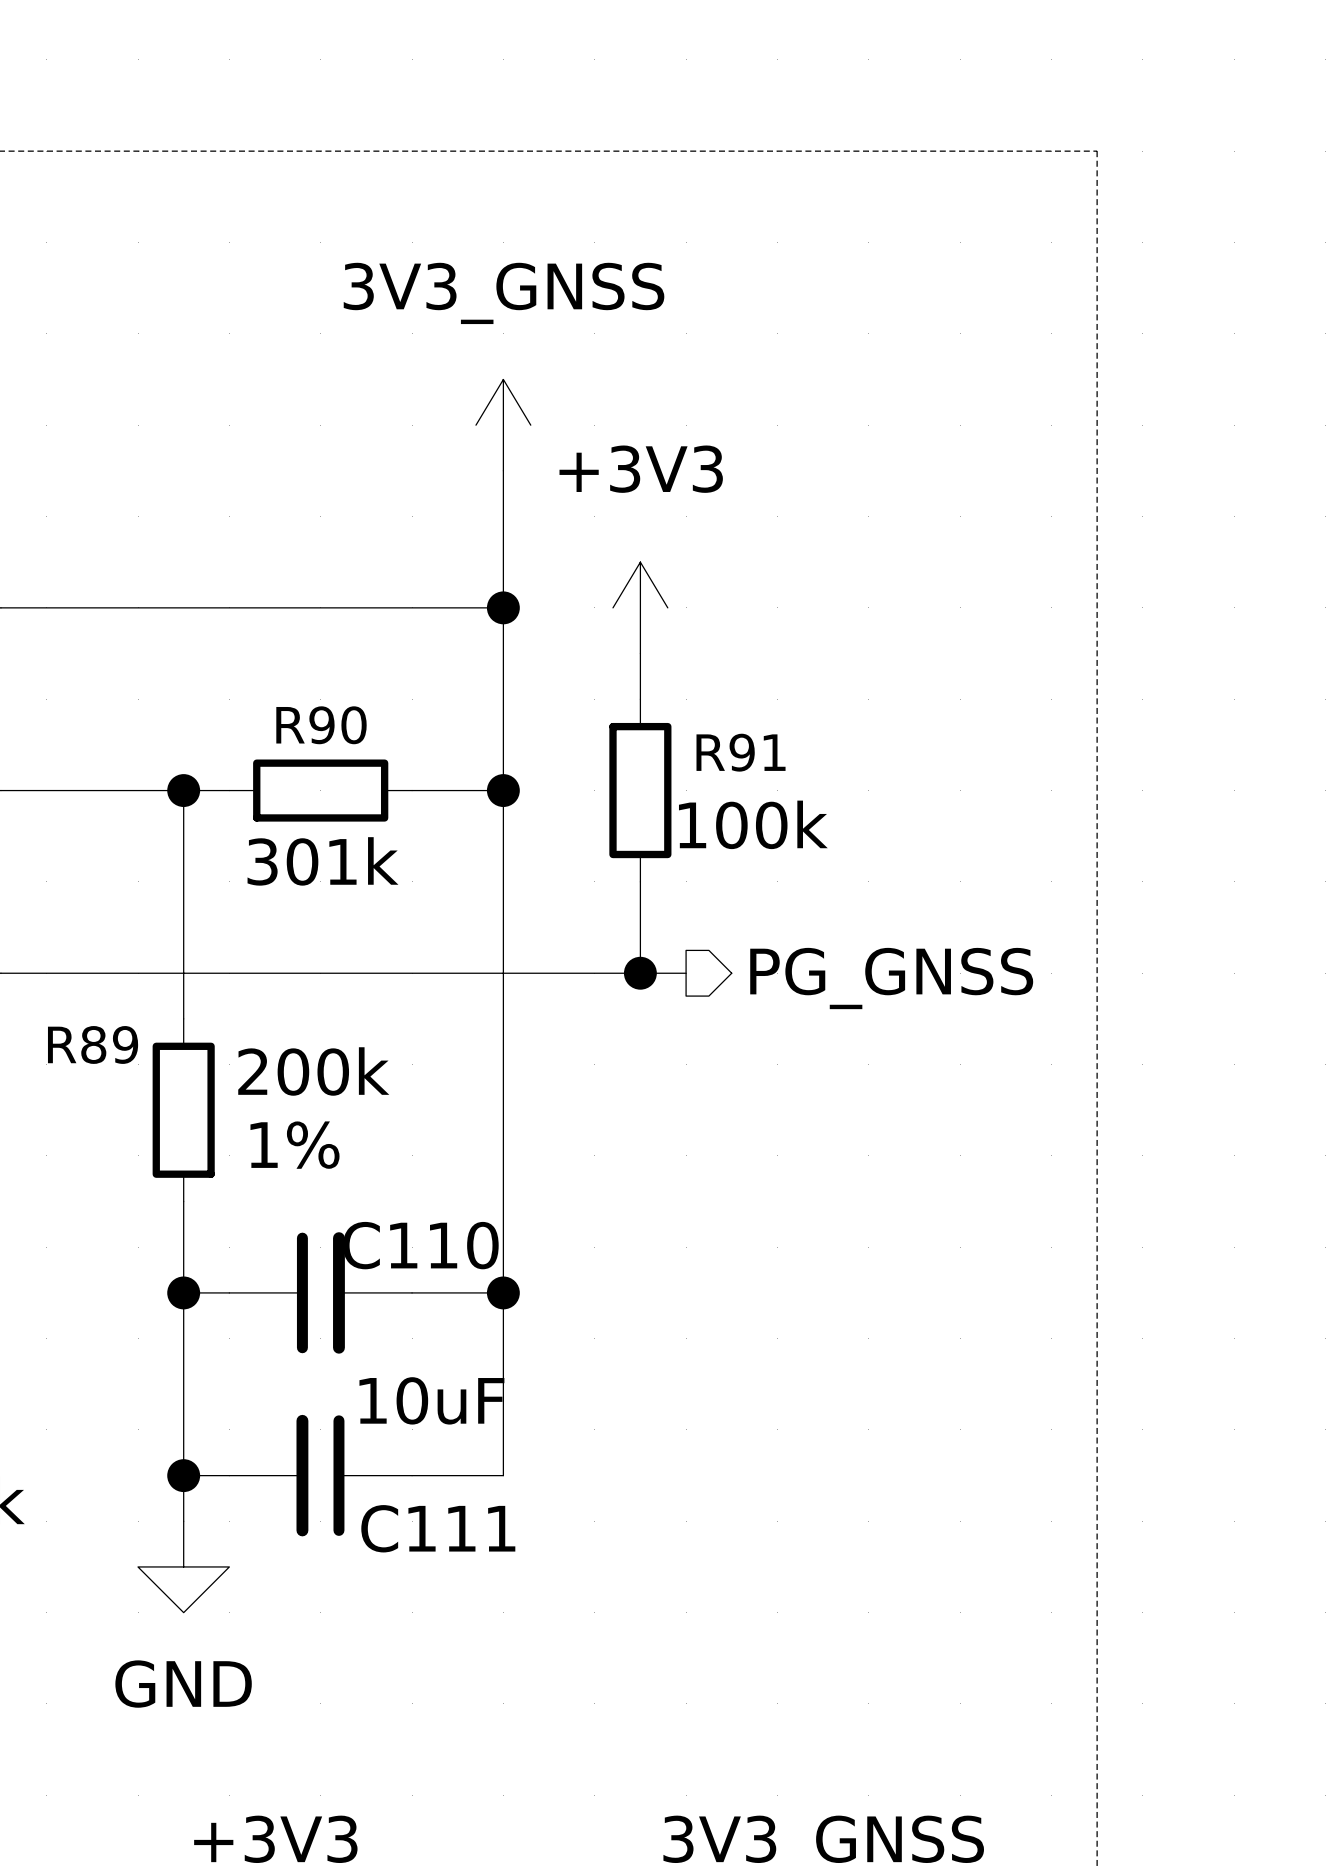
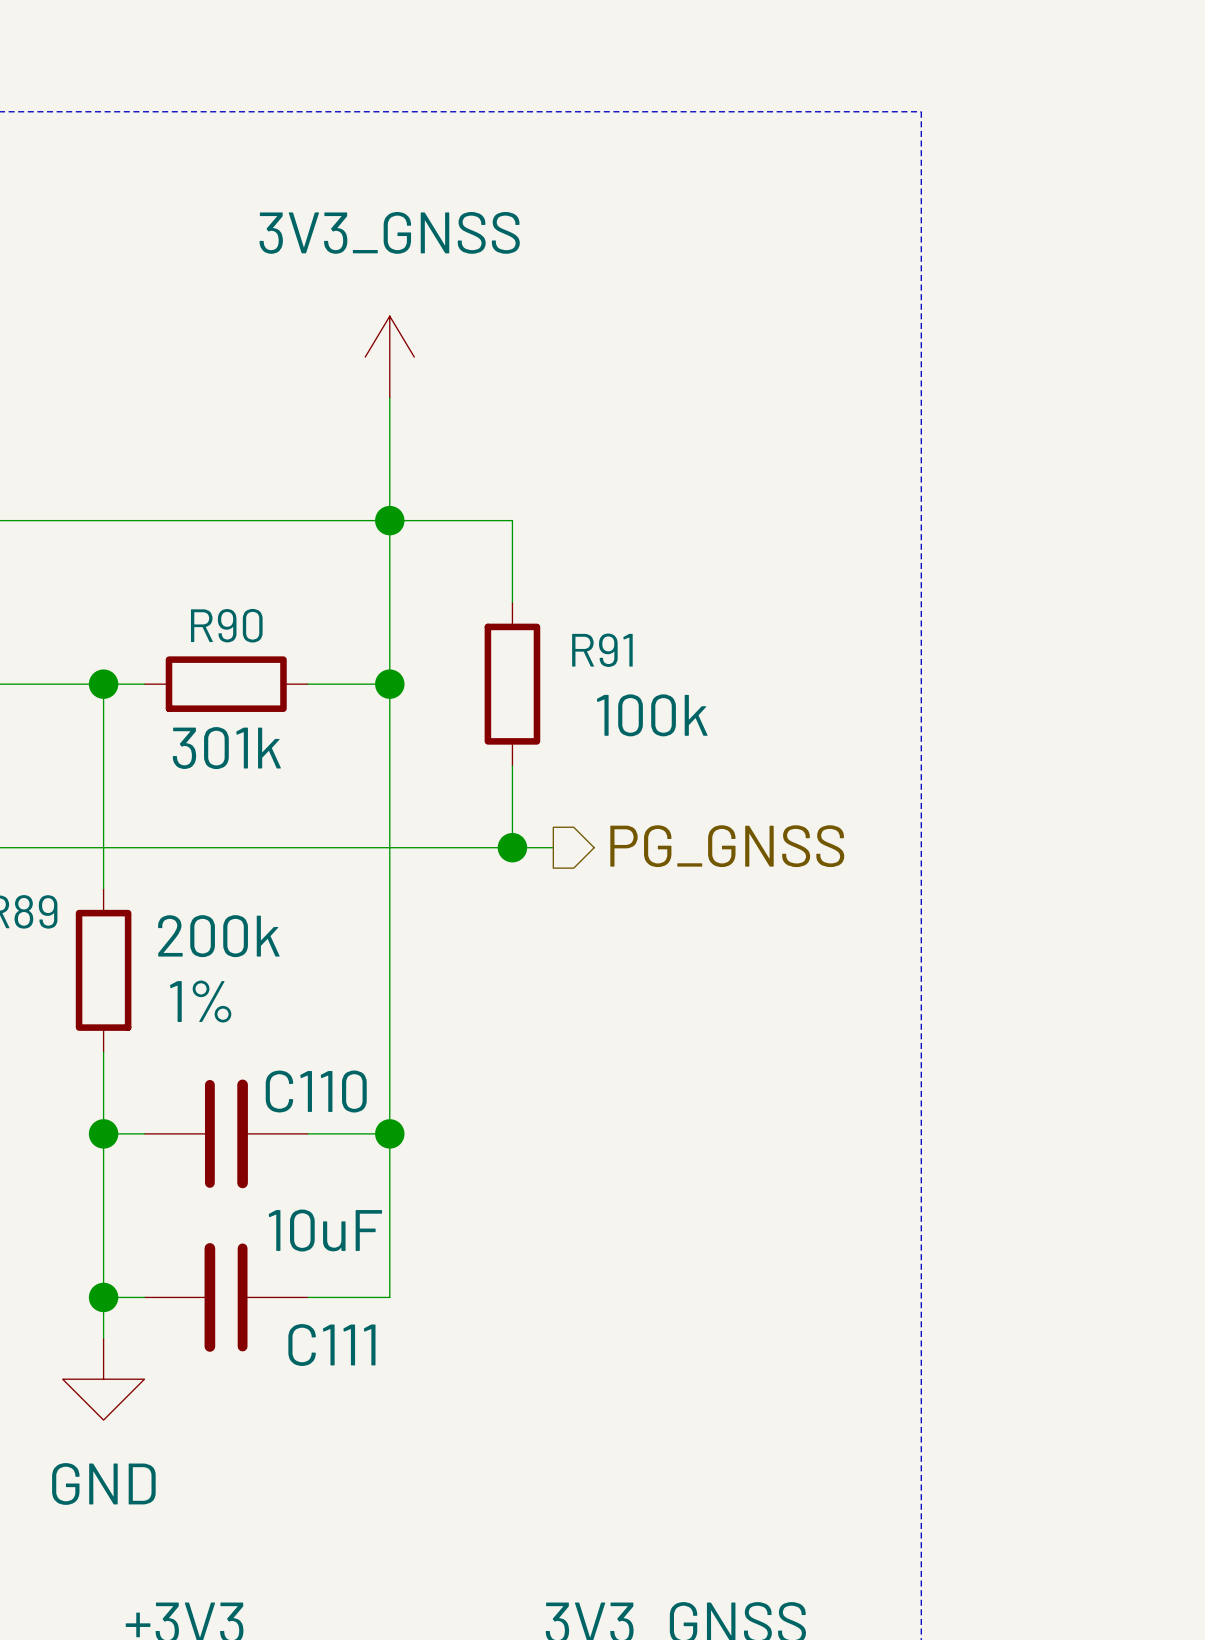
wire: none -> (389, 520) (512, 520) (512, 561)
power symbol: +3V3 (640, 607) -> none
R91 value position: 100k (753, 824) -> 100k (652, 715)

